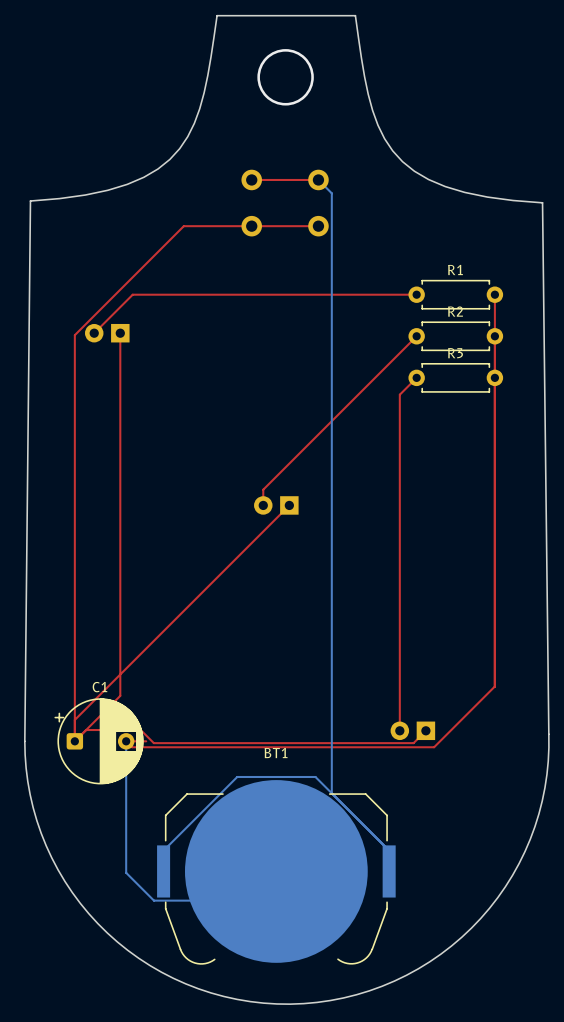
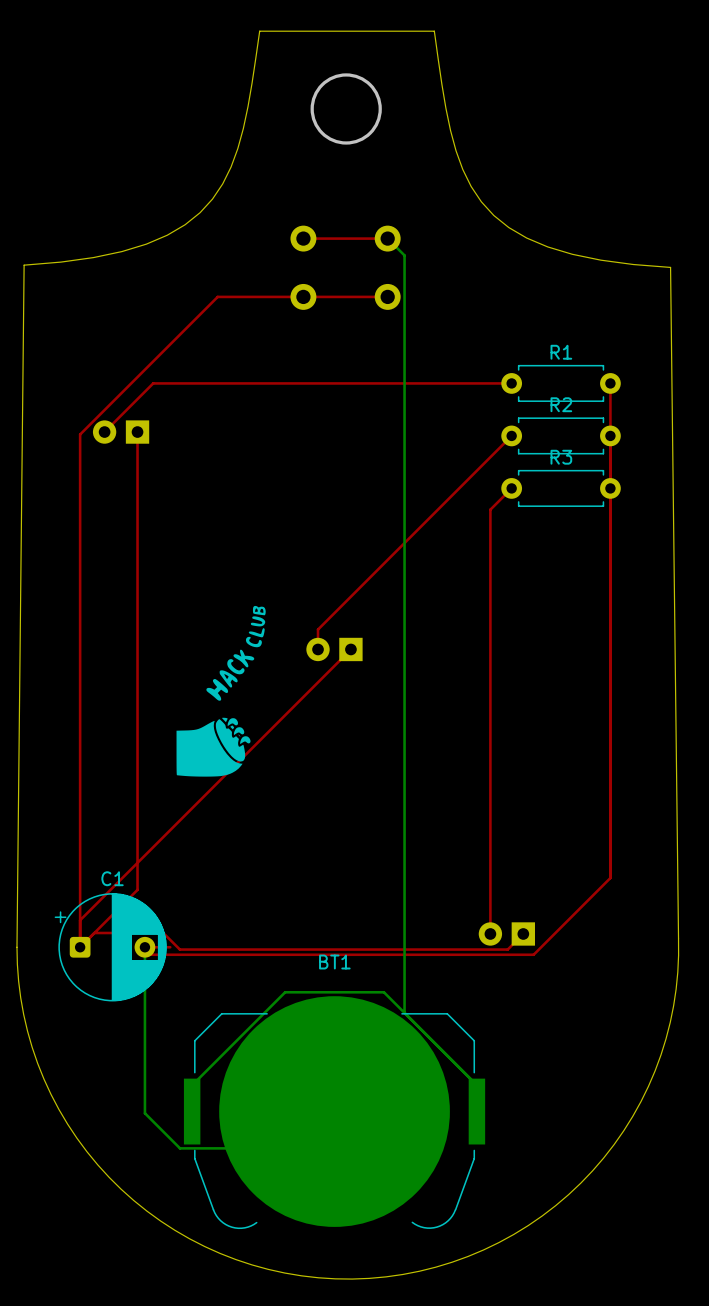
drawing: none -> [176, 605, 266, 777]

